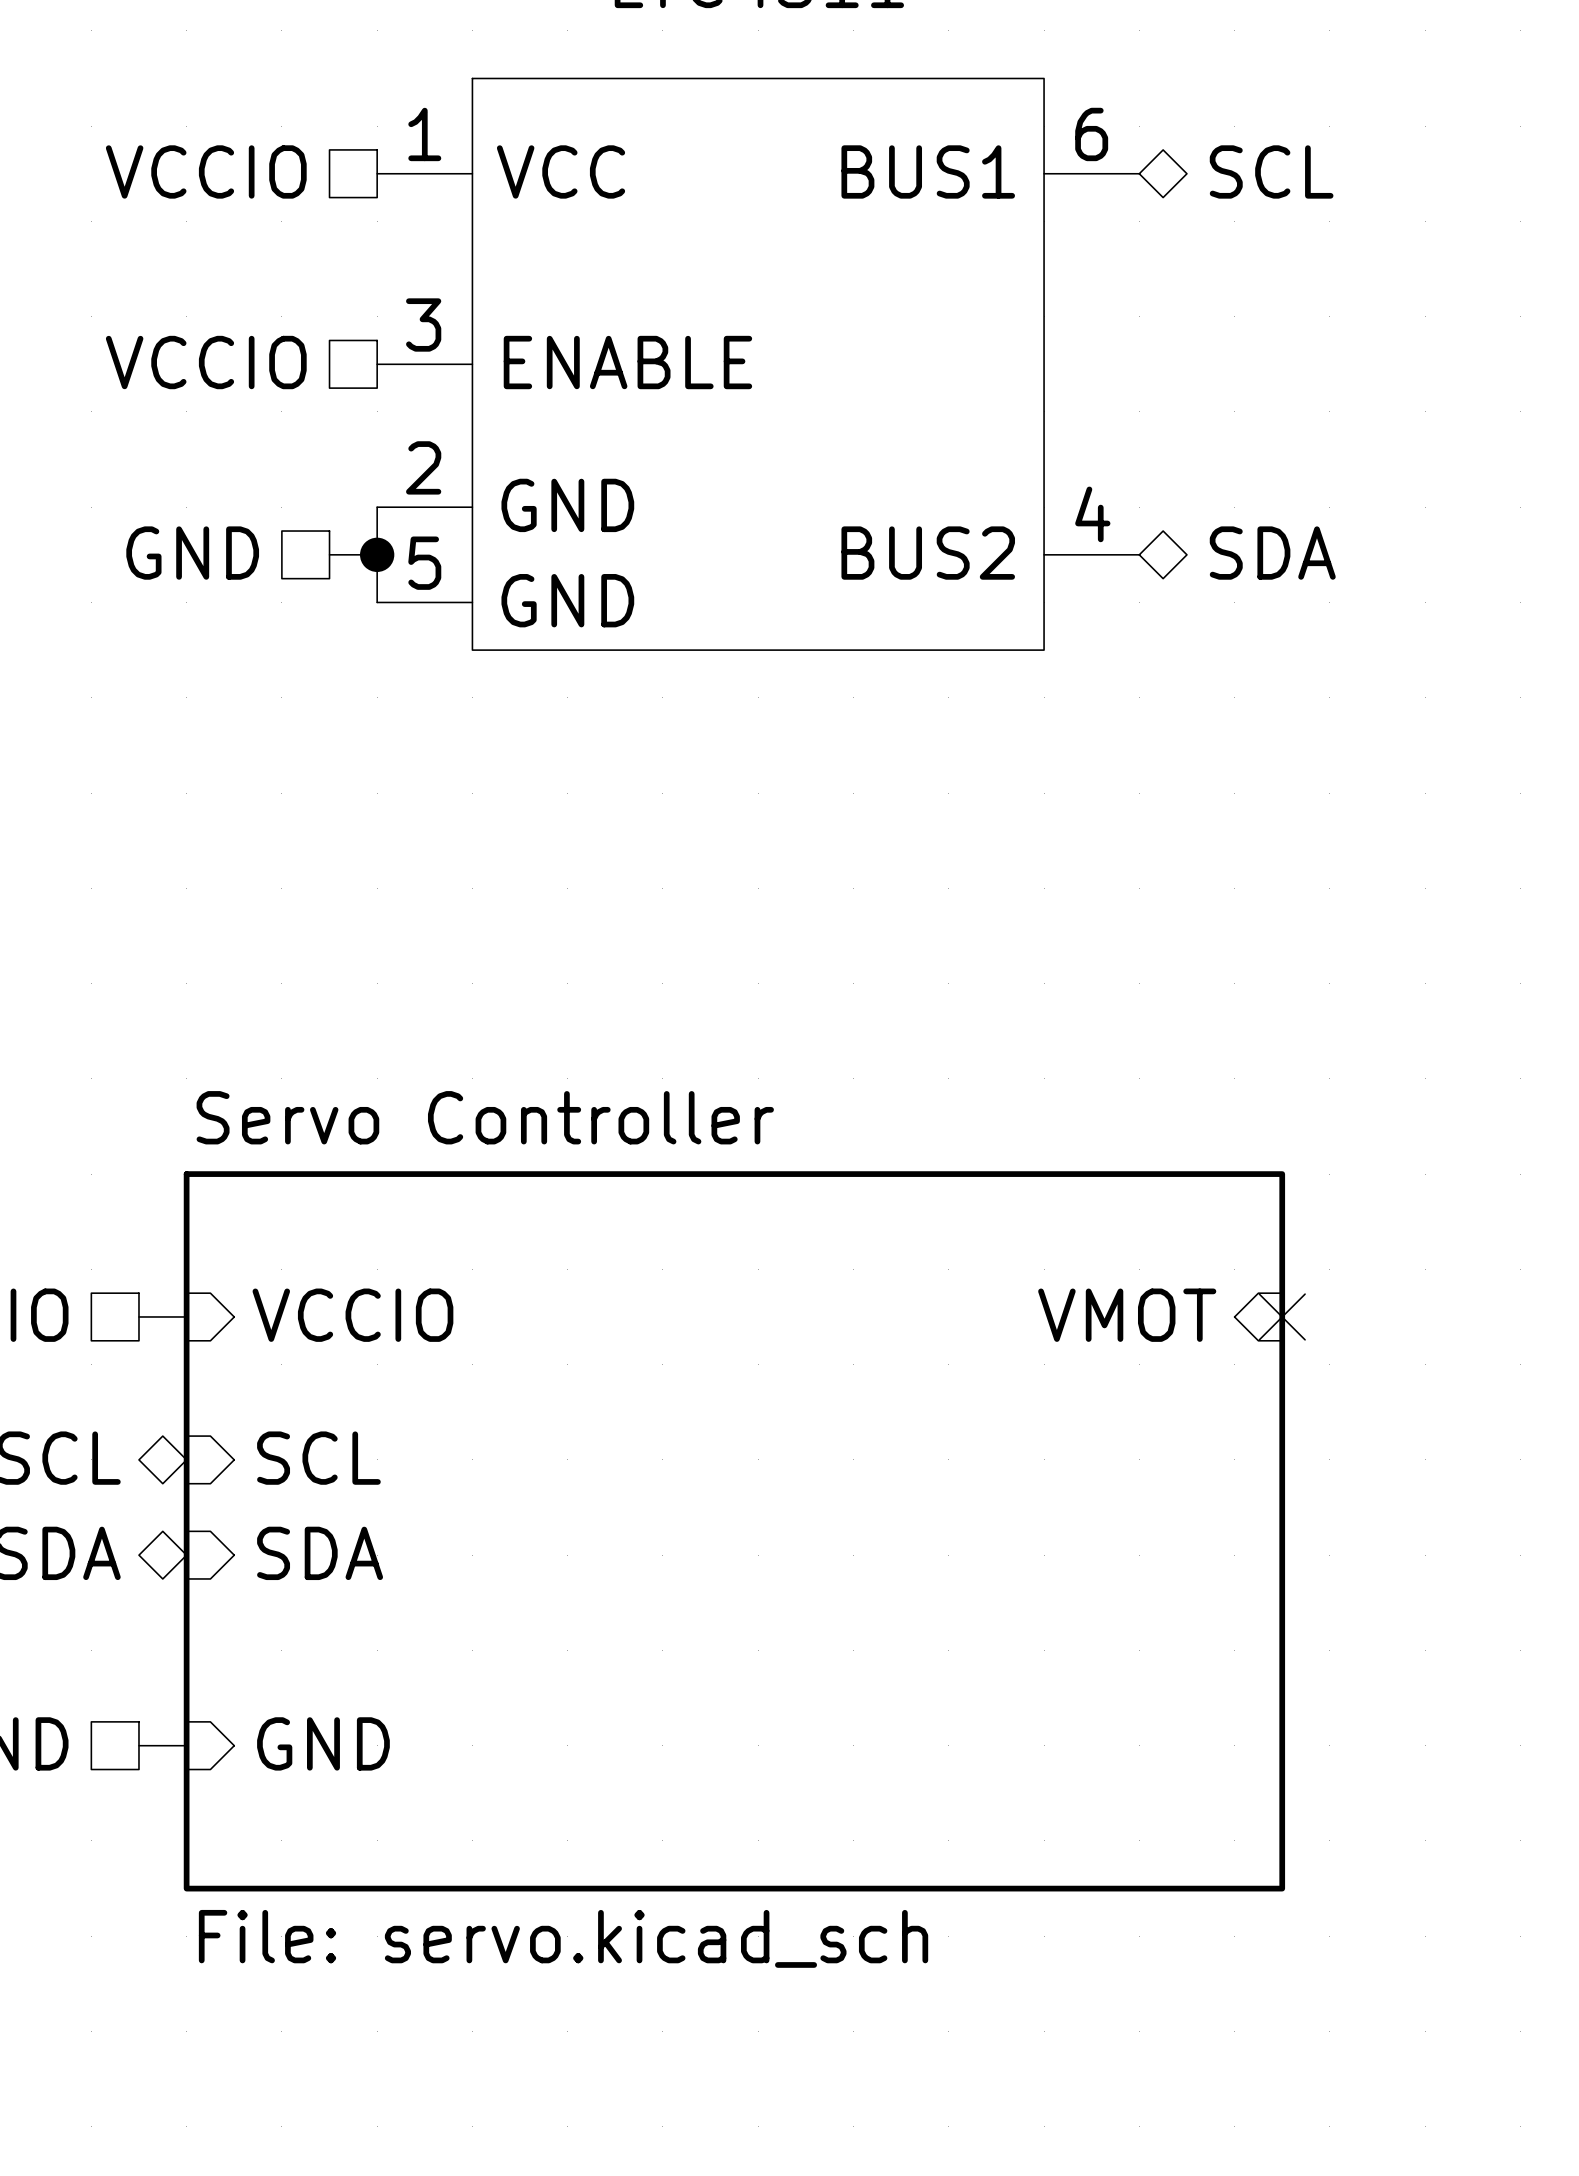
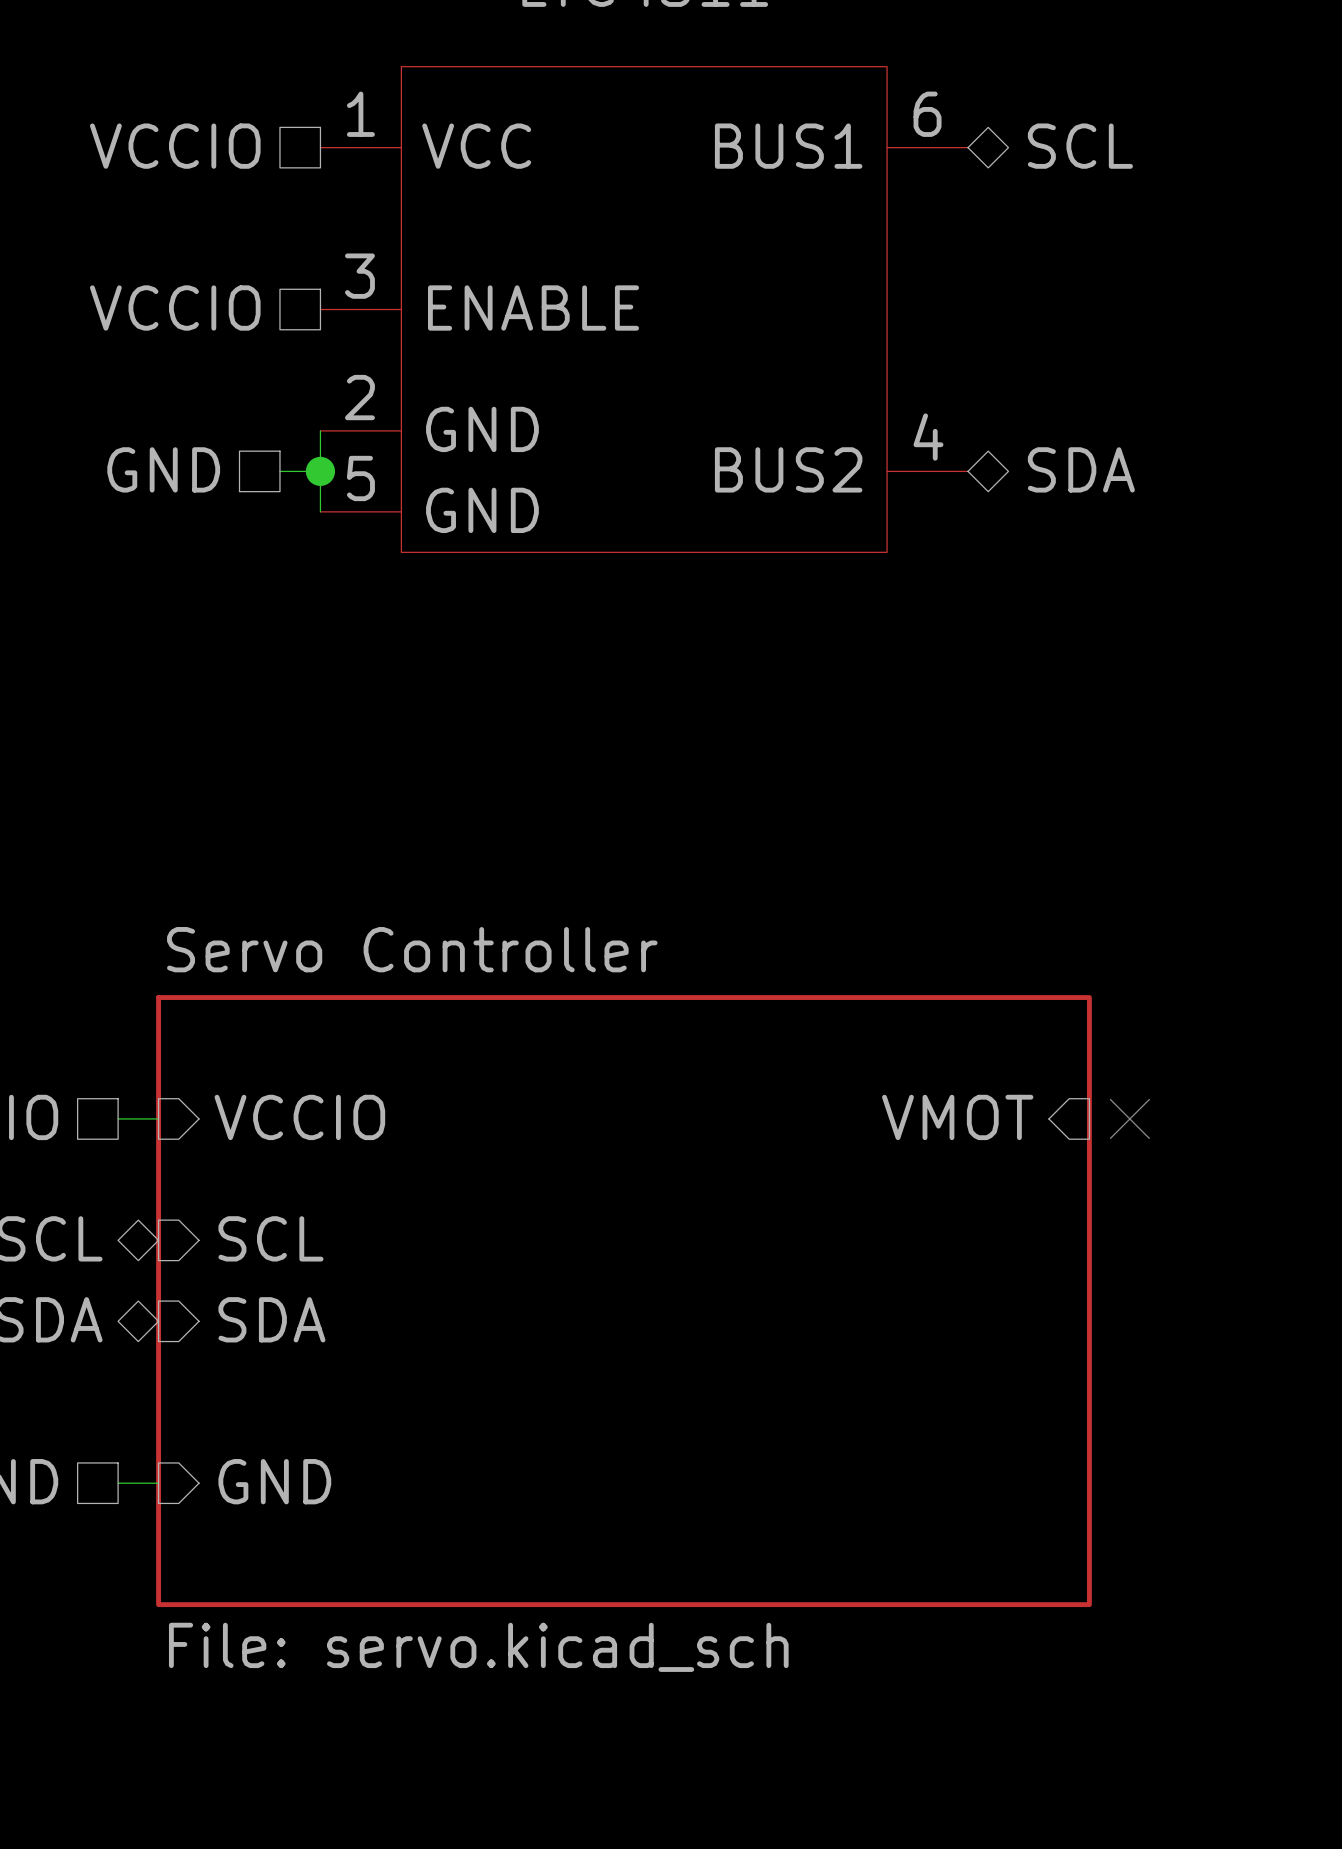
no-connect mark position: (1282, 1316) -> (1129, 1118)

